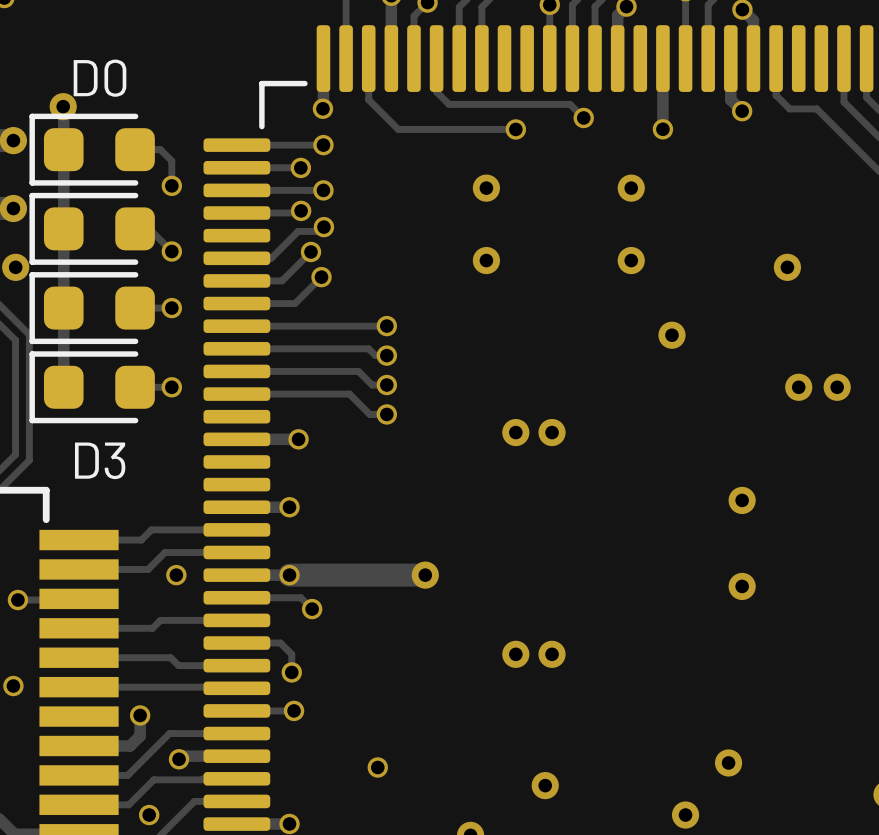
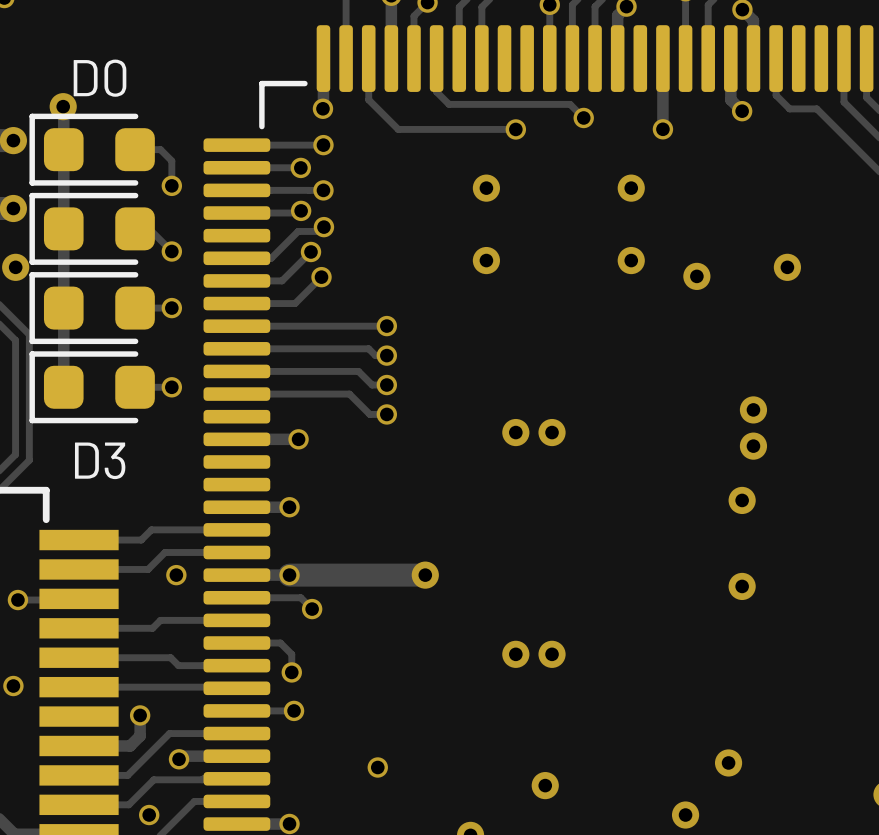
via: none -> (696, 276)
via: (671, 335) -> none
via: (798, 387) -> none
via: (837, 387) -> none
via: none -> (753, 409)
via: none -> (753, 446)

